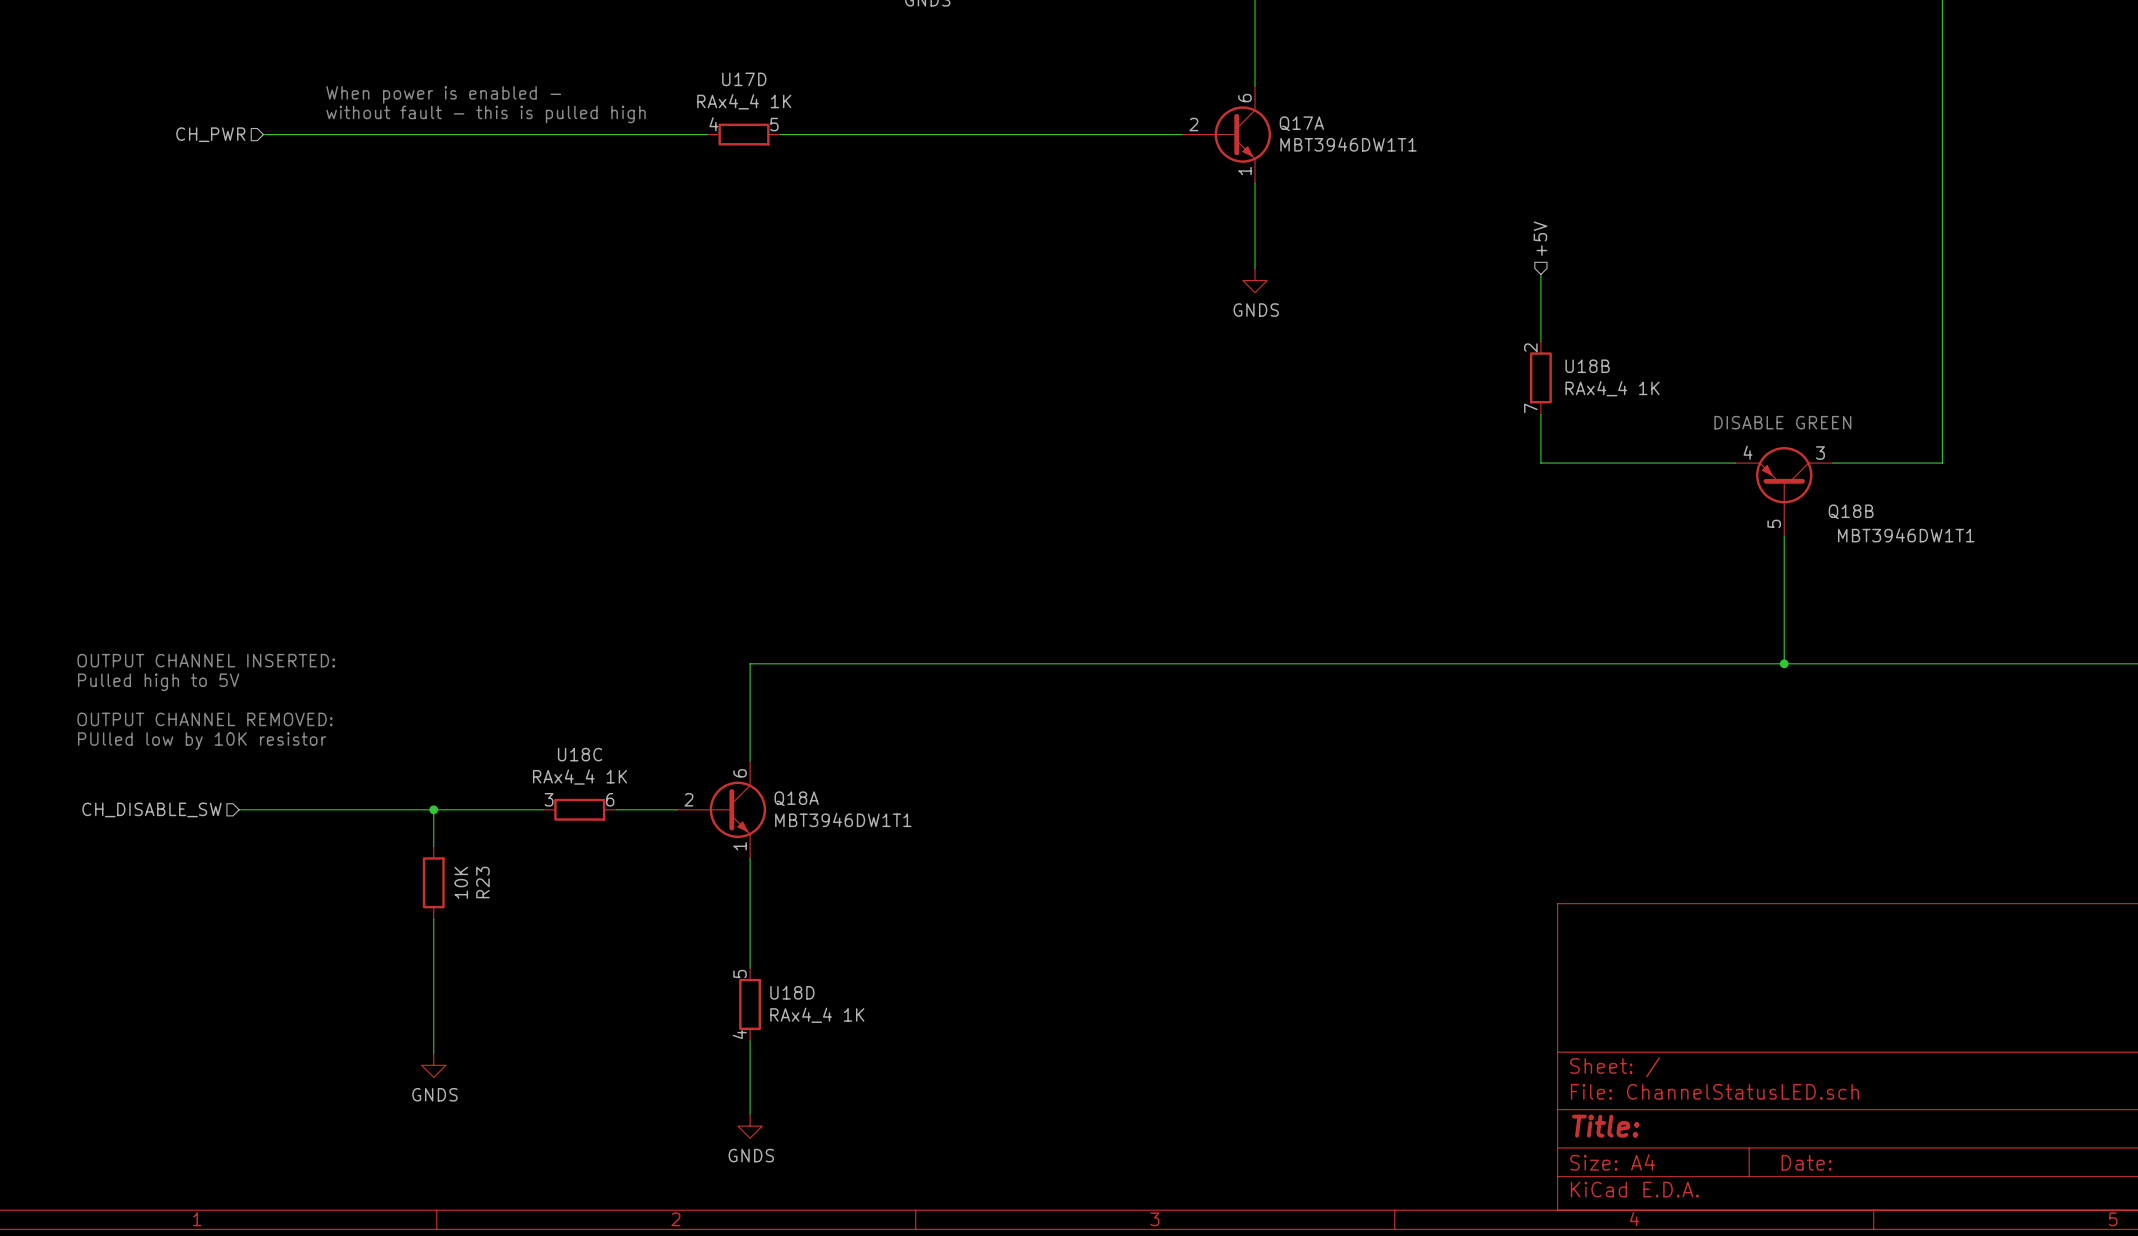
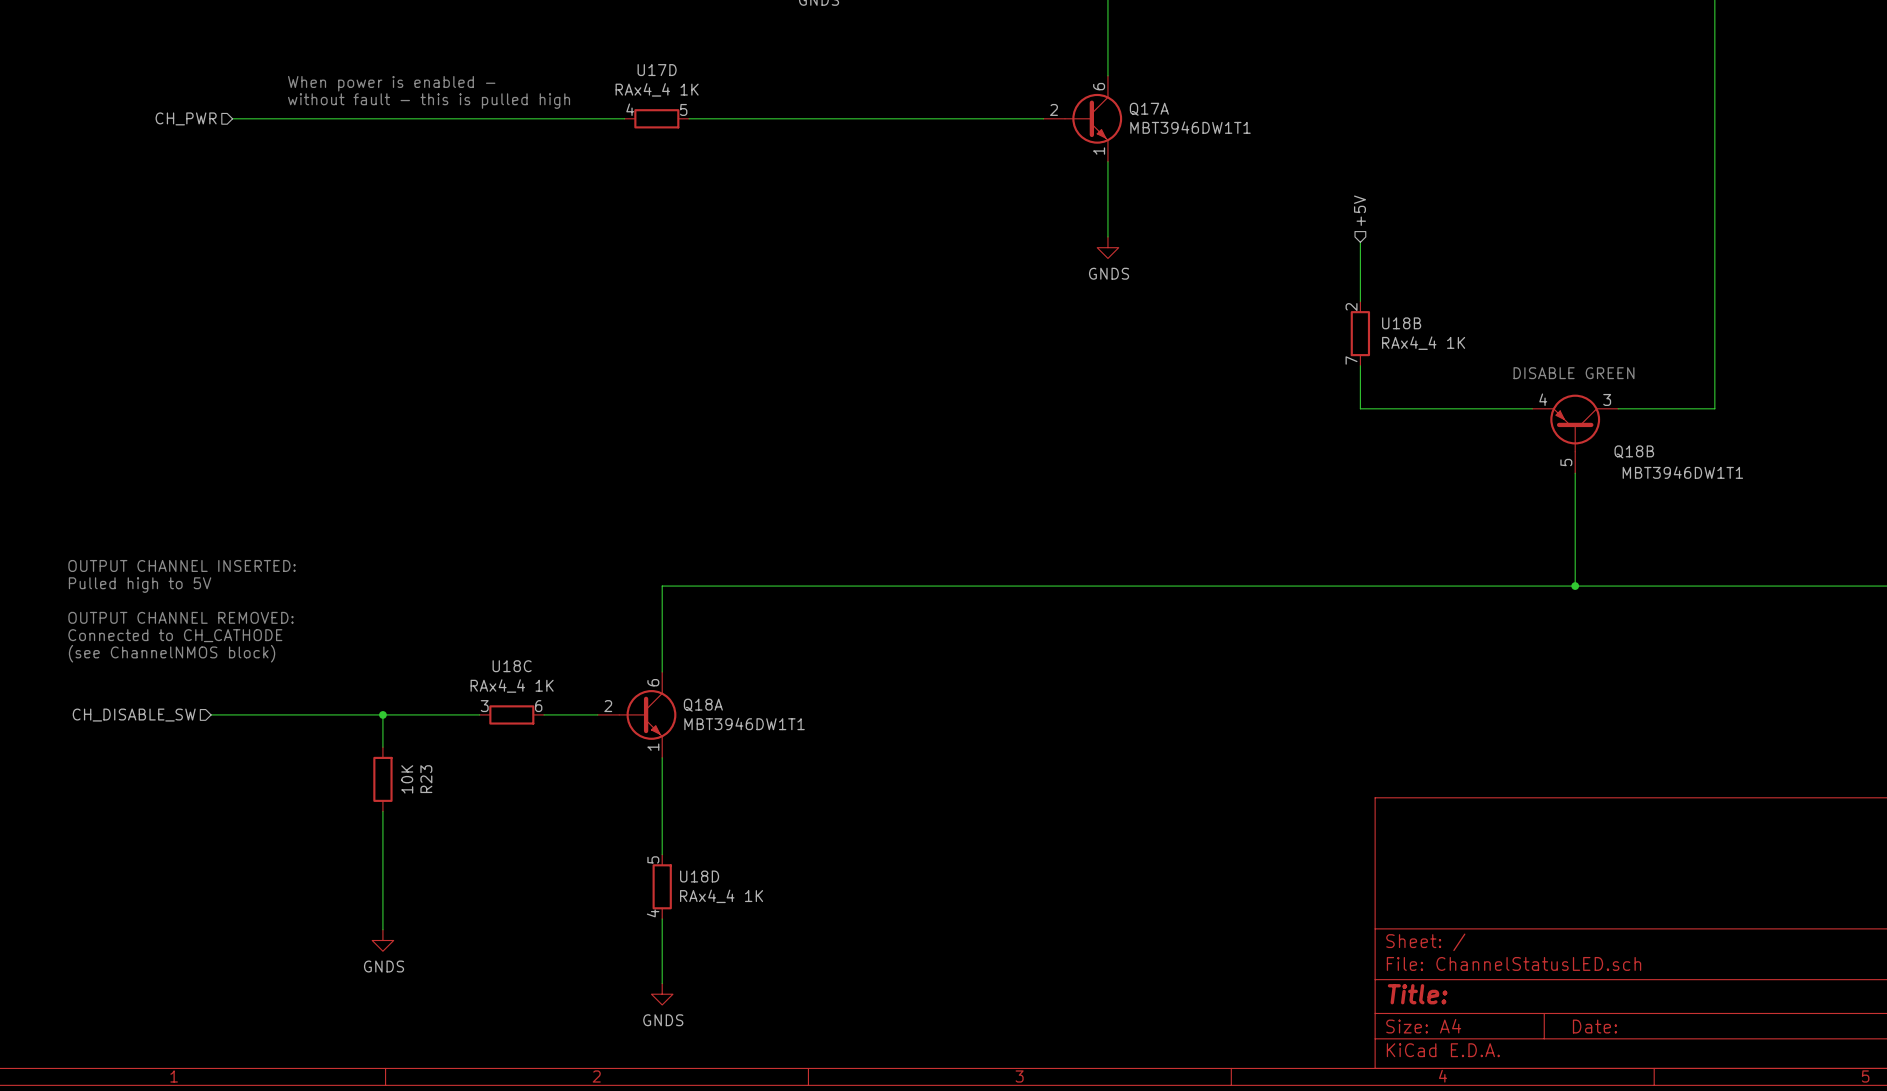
text: none -> OUTPUT CHANNEL INSERTED: (182, 565)
text: OUTPUT CHANNEL INSERTED: (206, 660) -> Pulled high to 5V (140, 585)
text: Pulled high to 5V (158, 682) -> none
text: none -> OUTPUT CHANNEL REMOVED: (180, 617)
text: OUTPUT CHANNEL REMOVED: (205, 719) -> Connected to CH_CATHODE (175, 635)
text: PUlled low by 10K resistor (202, 741) -> (see ChannelNMOS block) (172, 653)

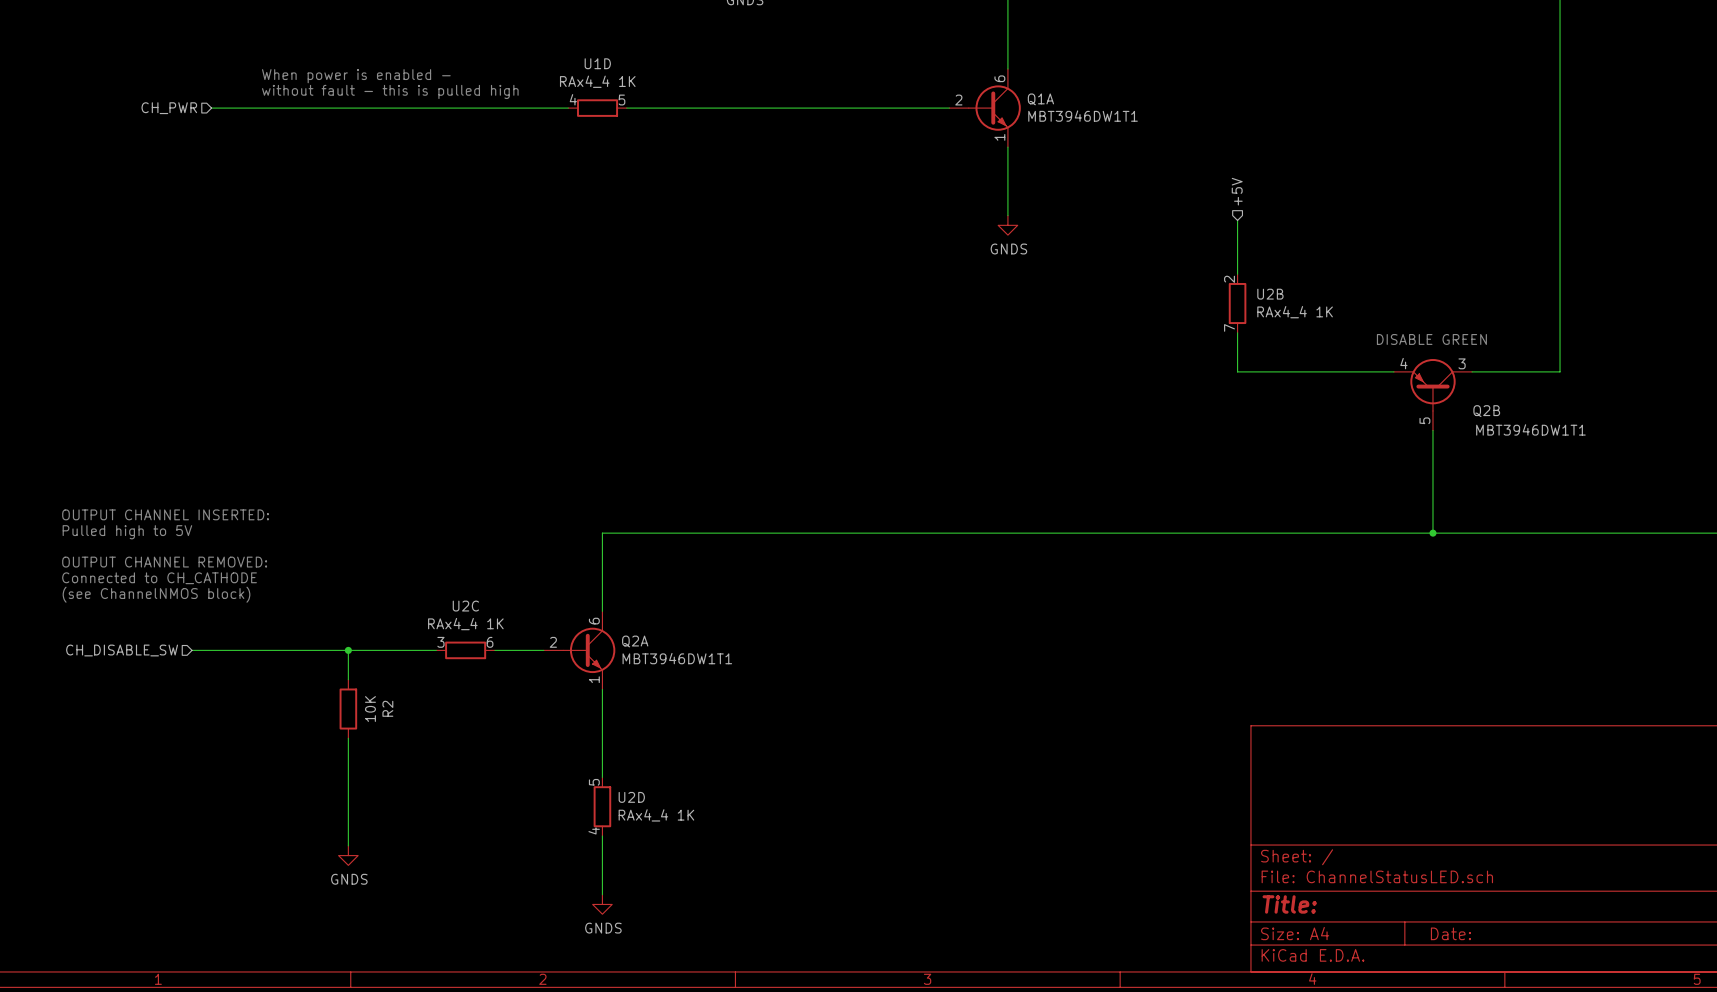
U17D name: U17D (657, 70) -> U1D (597, 63)
Q17A name: Q17A (1149, 109) -> Q1A (1040, 99)
U18B name: U18B (1401, 323) -> U2B (1270, 294)
Q18B name: Q18B (1634, 451) -> Q2B (1486, 411)
U18C name: U18C (512, 666) -> U2C (465, 606)
Q18A name: Q18A (703, 705) -> Q2A (635, 641)
R23 name: R23 (426, 779) -> R2 (387, 708)
U18D name: U18D (699, 876) -> U2D (631, 797)

